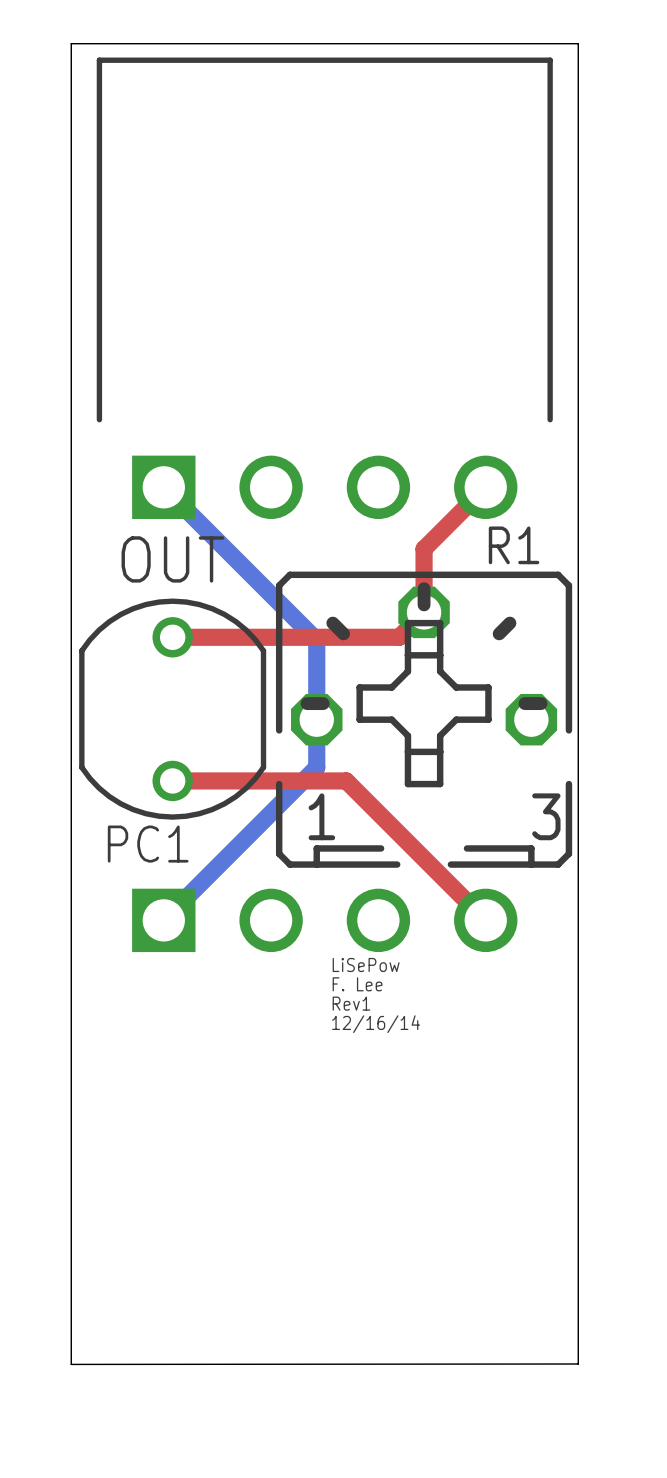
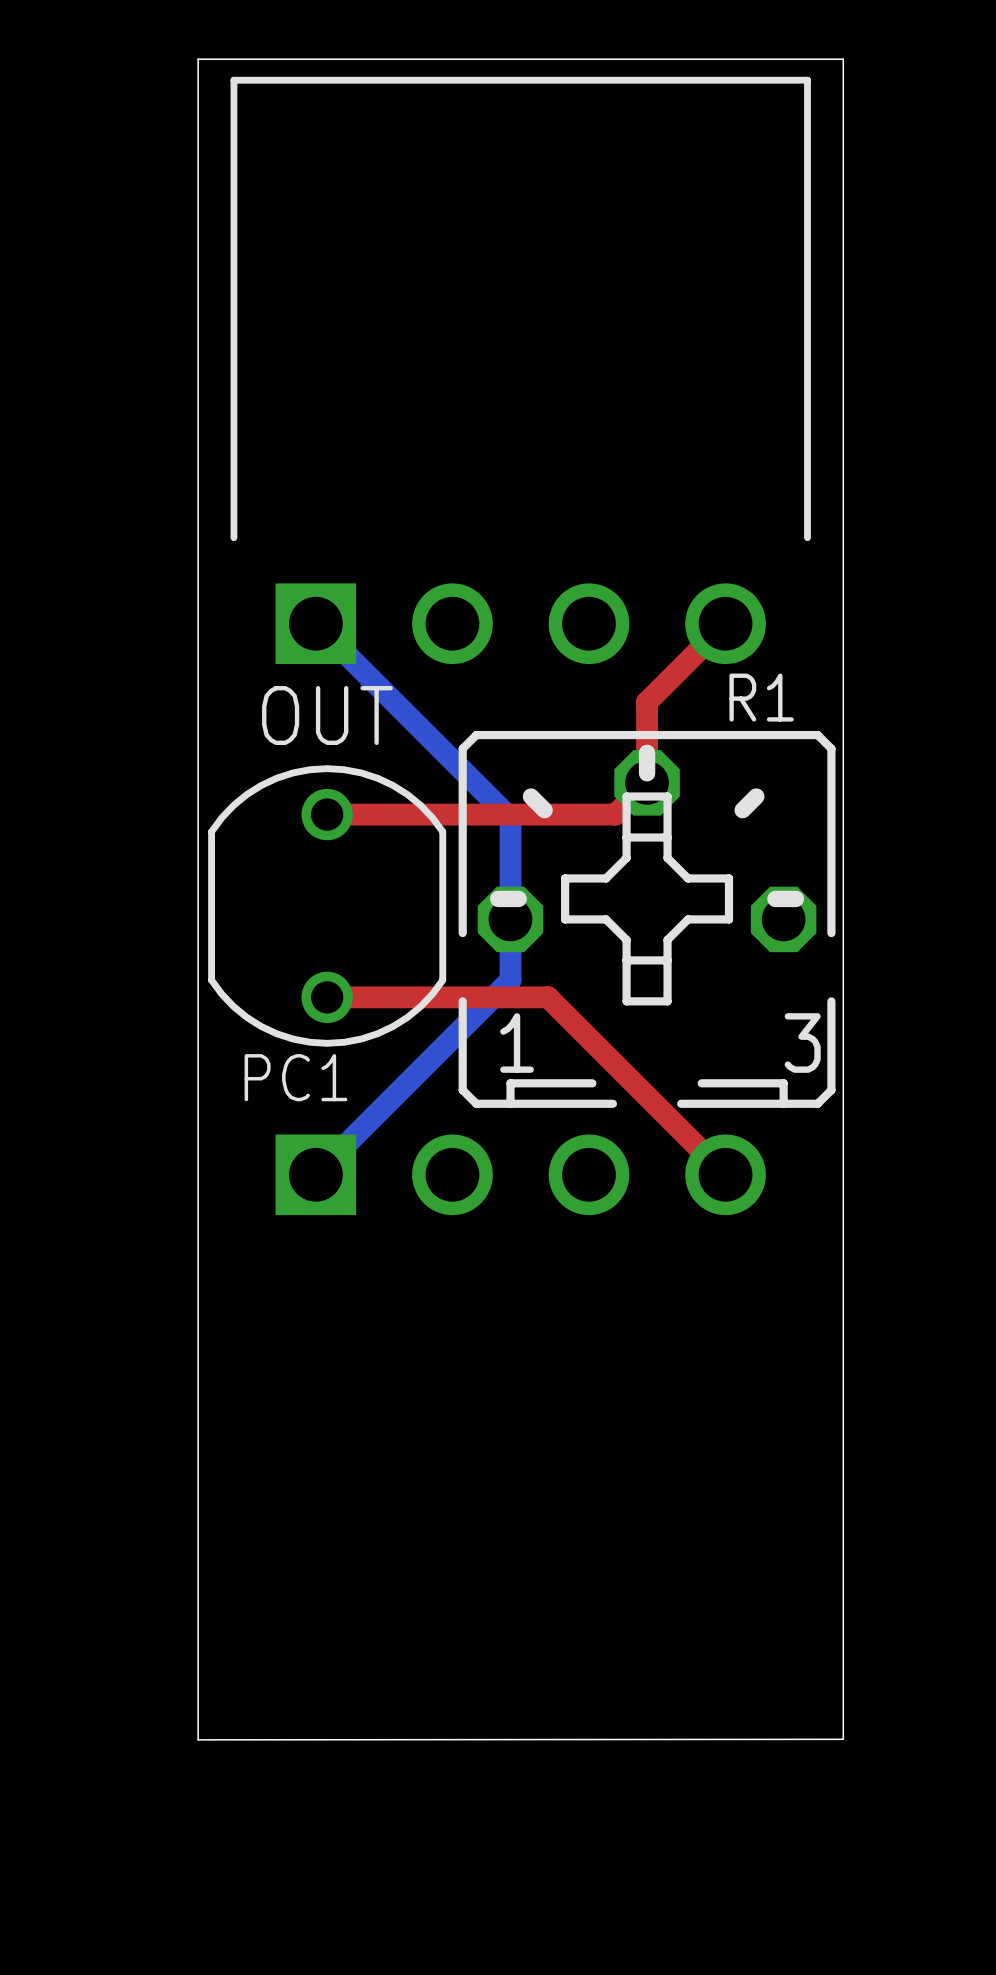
text: LiSePow (366, 964) -> none
text: F. Lee (357, 984) -> none
text: Rev1 (351, 1003) -> none
text: 12/16/14 (376, 1024) -> none

